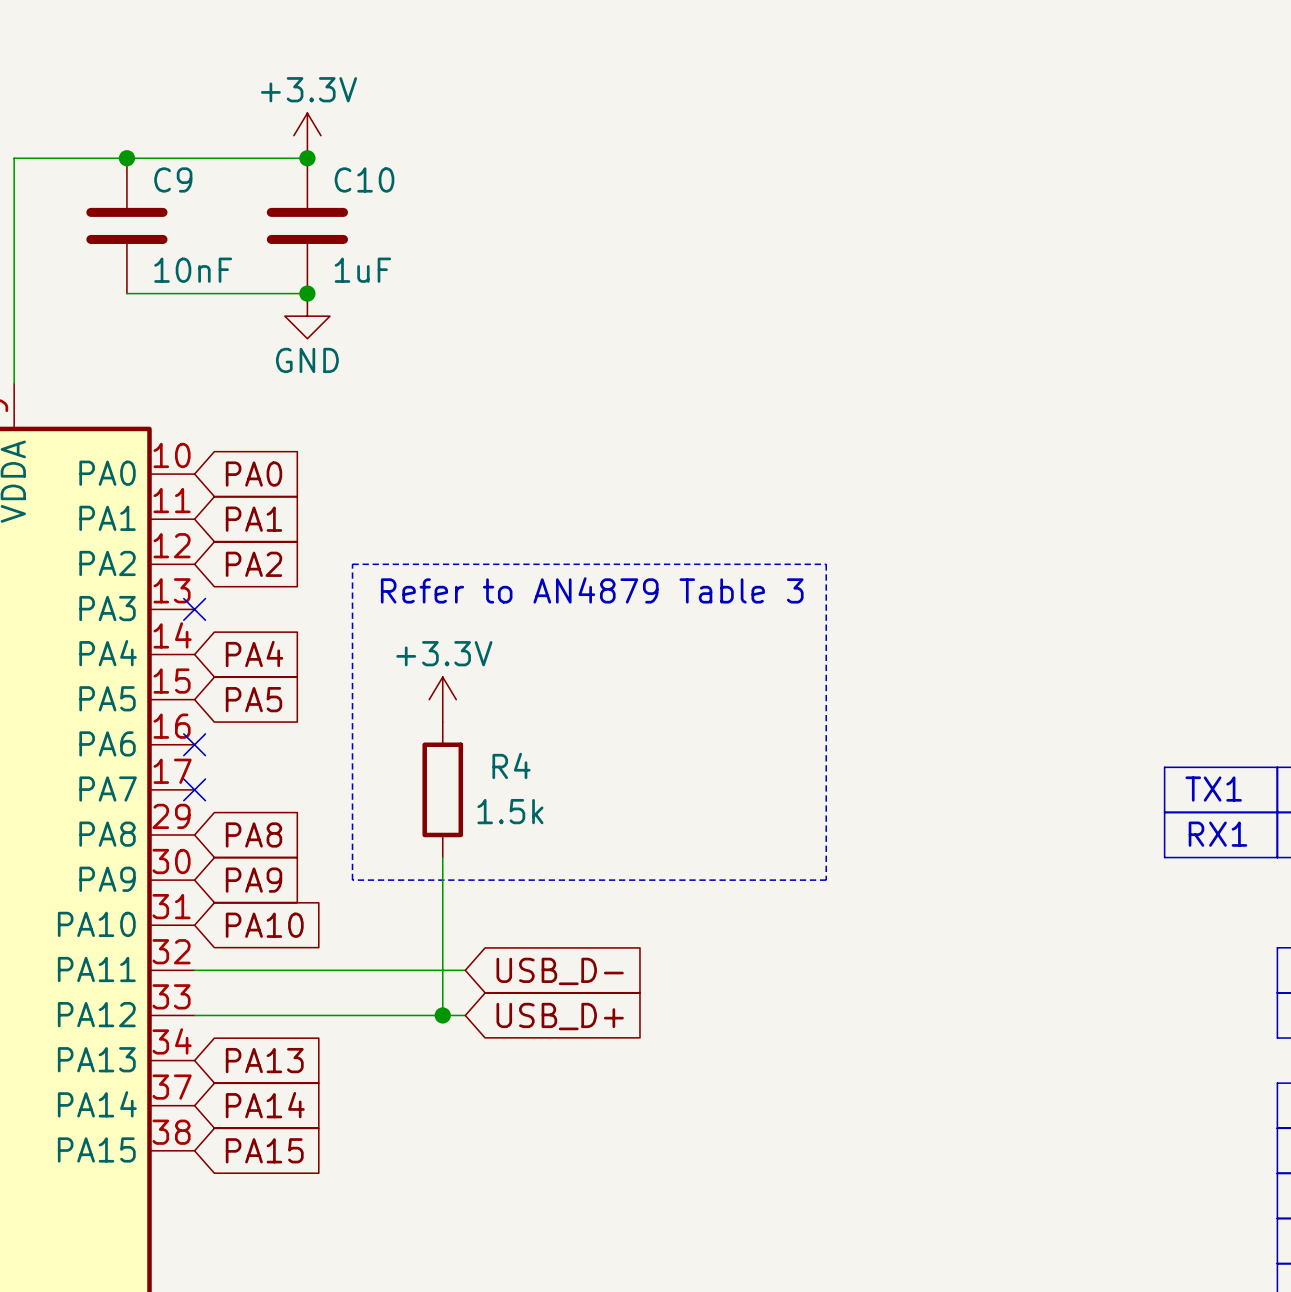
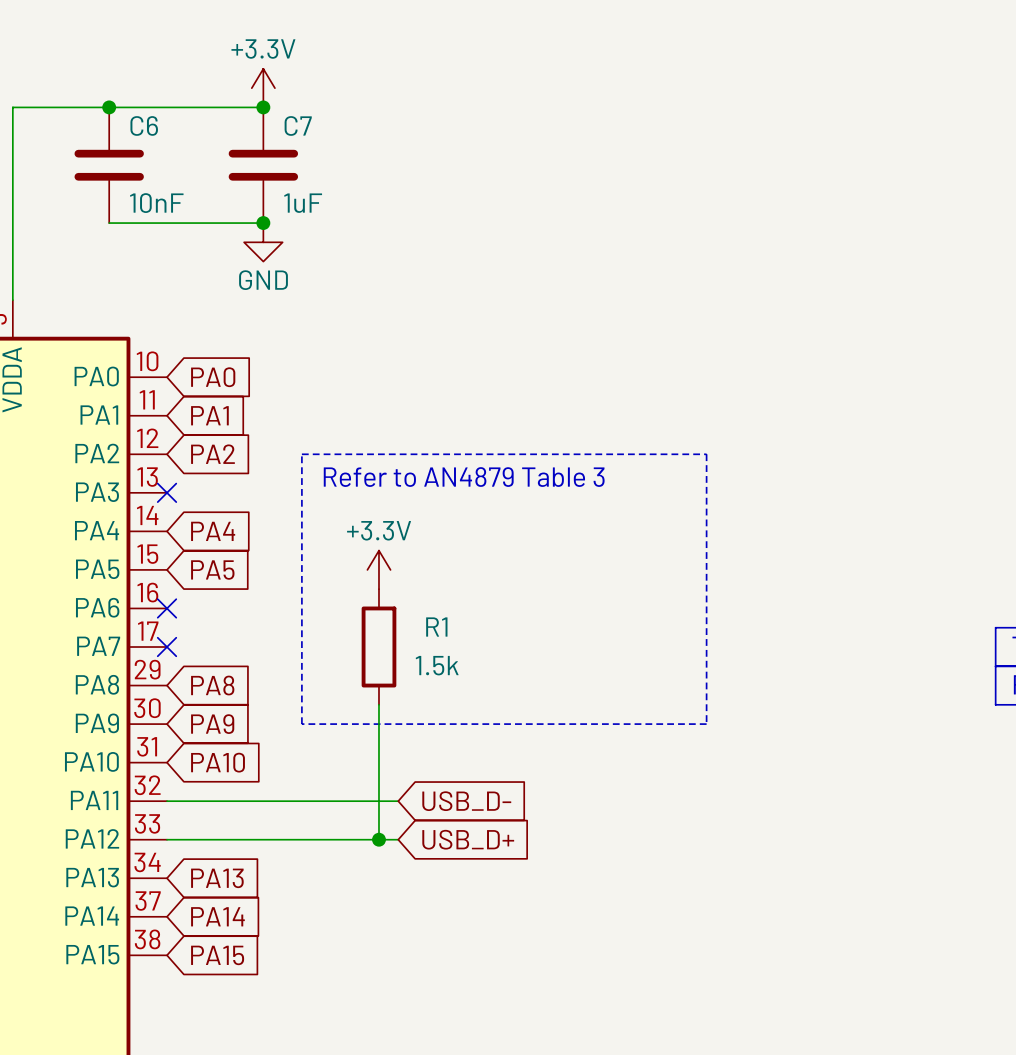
C9 name: C9 (173, 179) -> C6 (144, 125)
C10 name: C10 (364, 179) -> C7 (298, 125)
R4 name: R4 (511, 765) -> R1 (436, 627)

